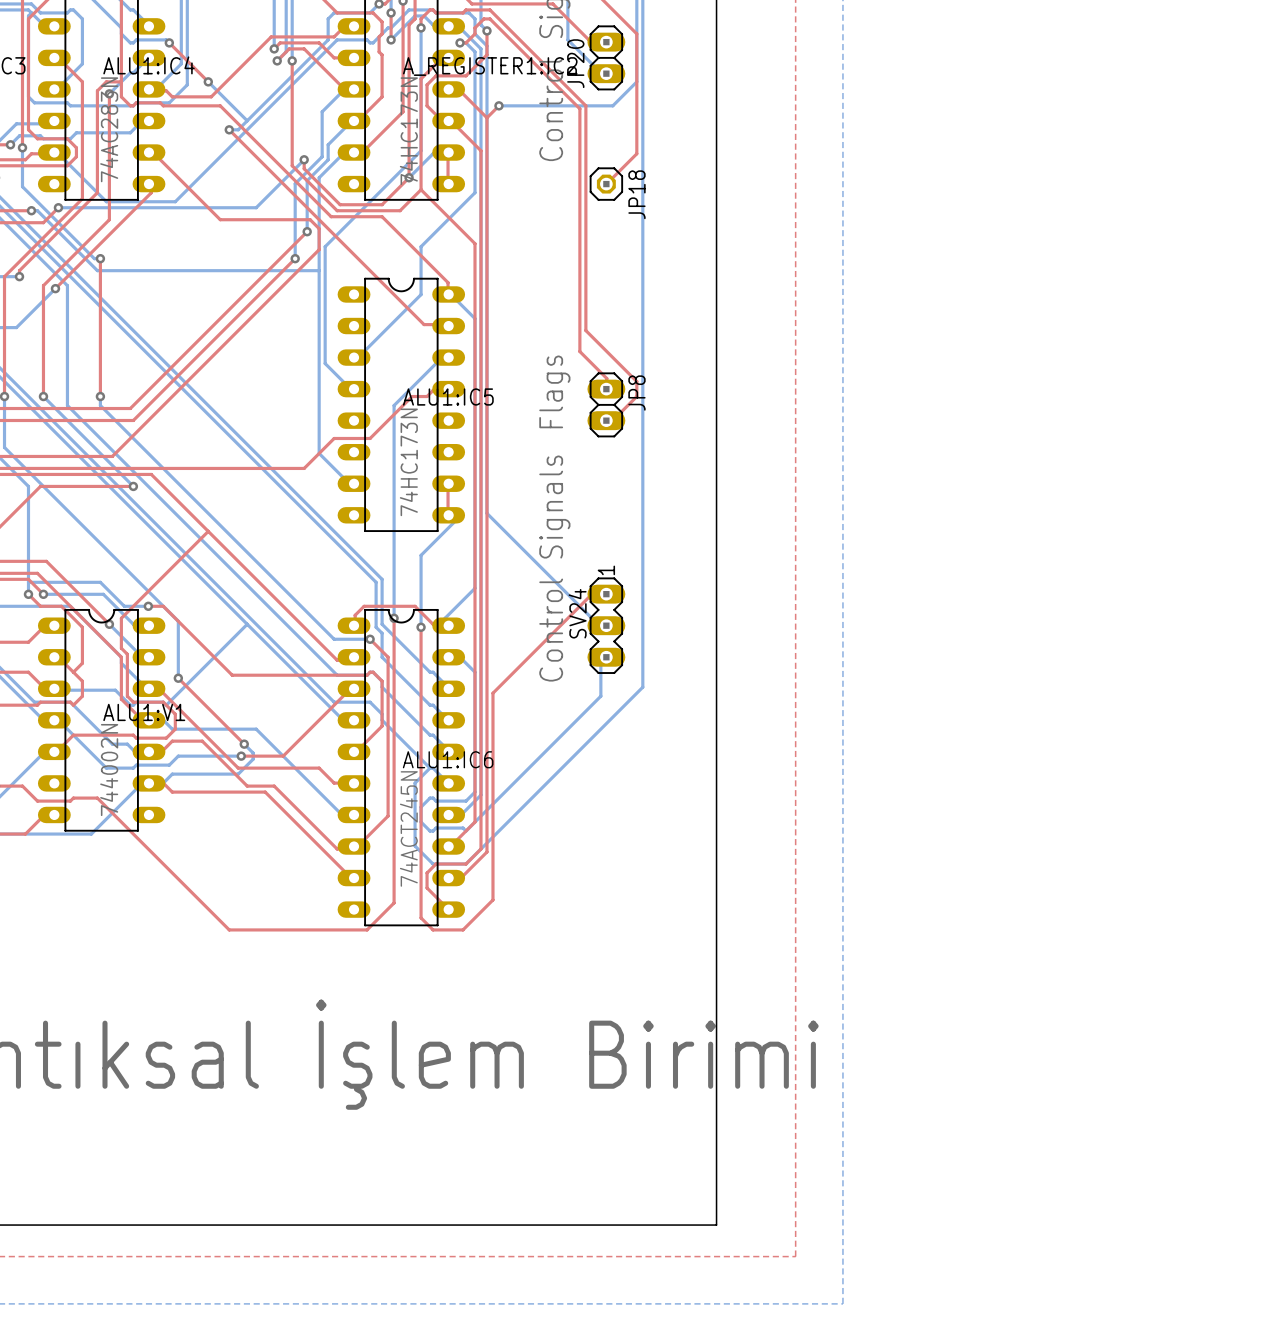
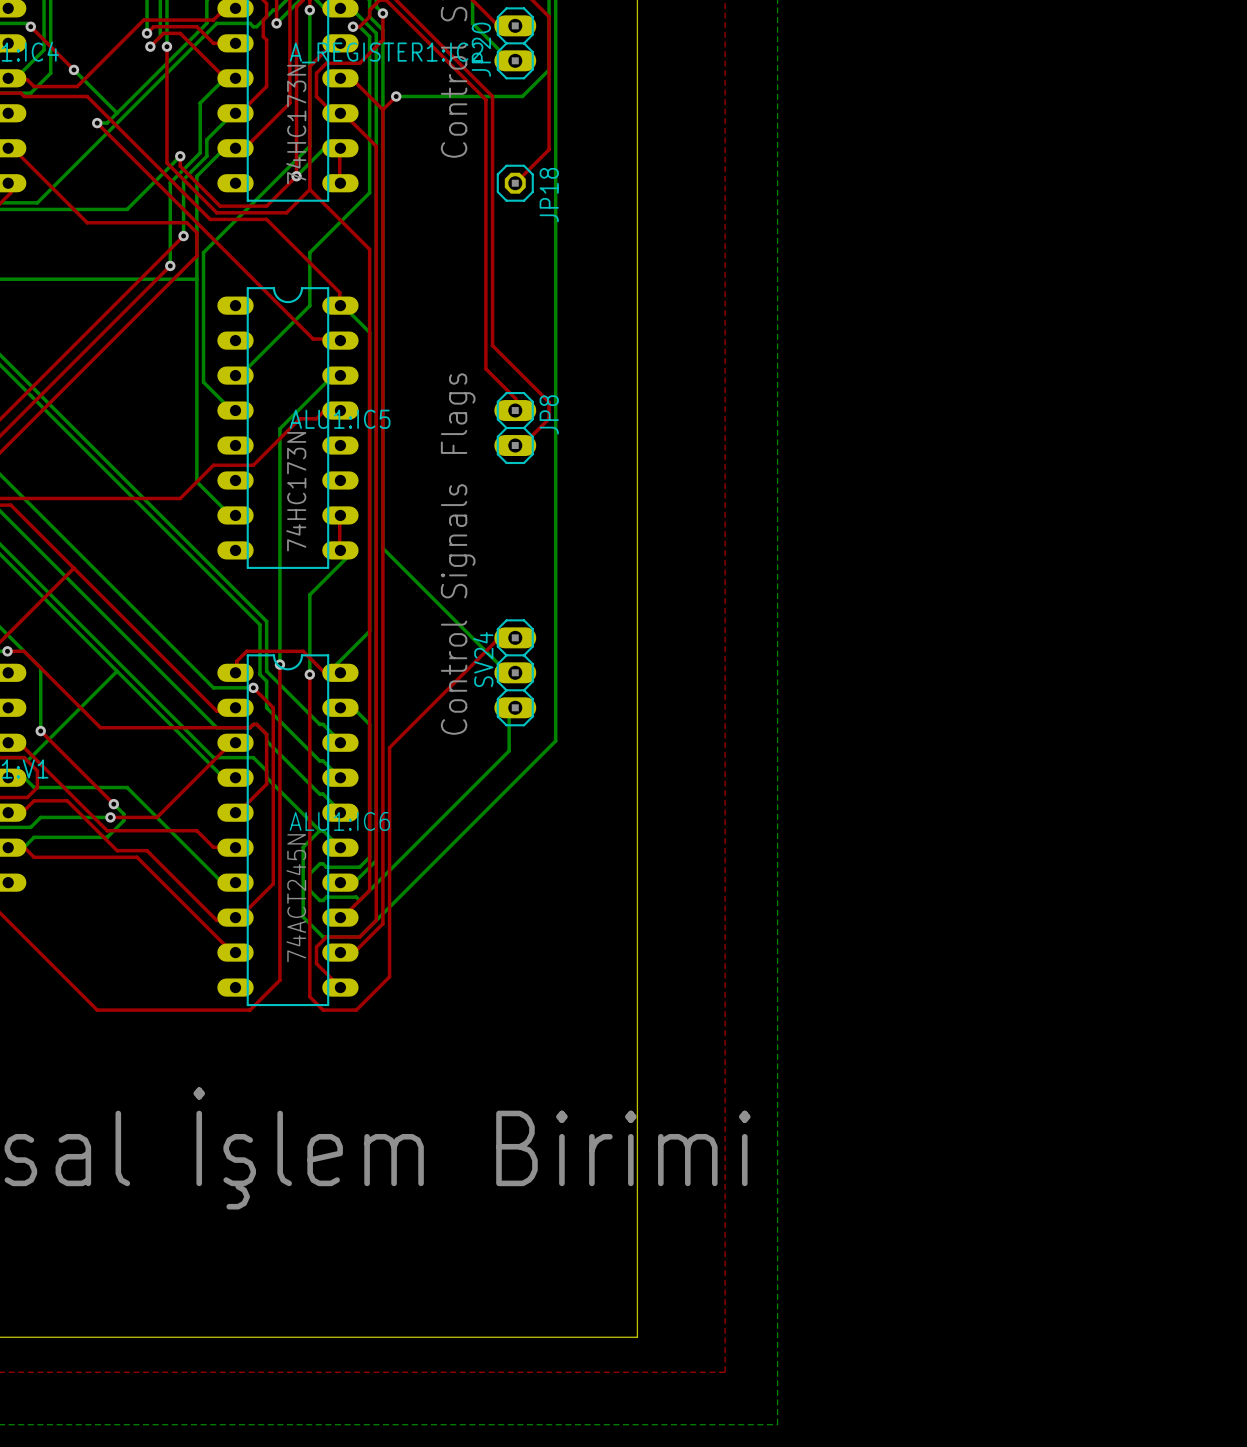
SV24 footprint: [587, 577, 626, 674] -> [494, 619, 537, 727]

